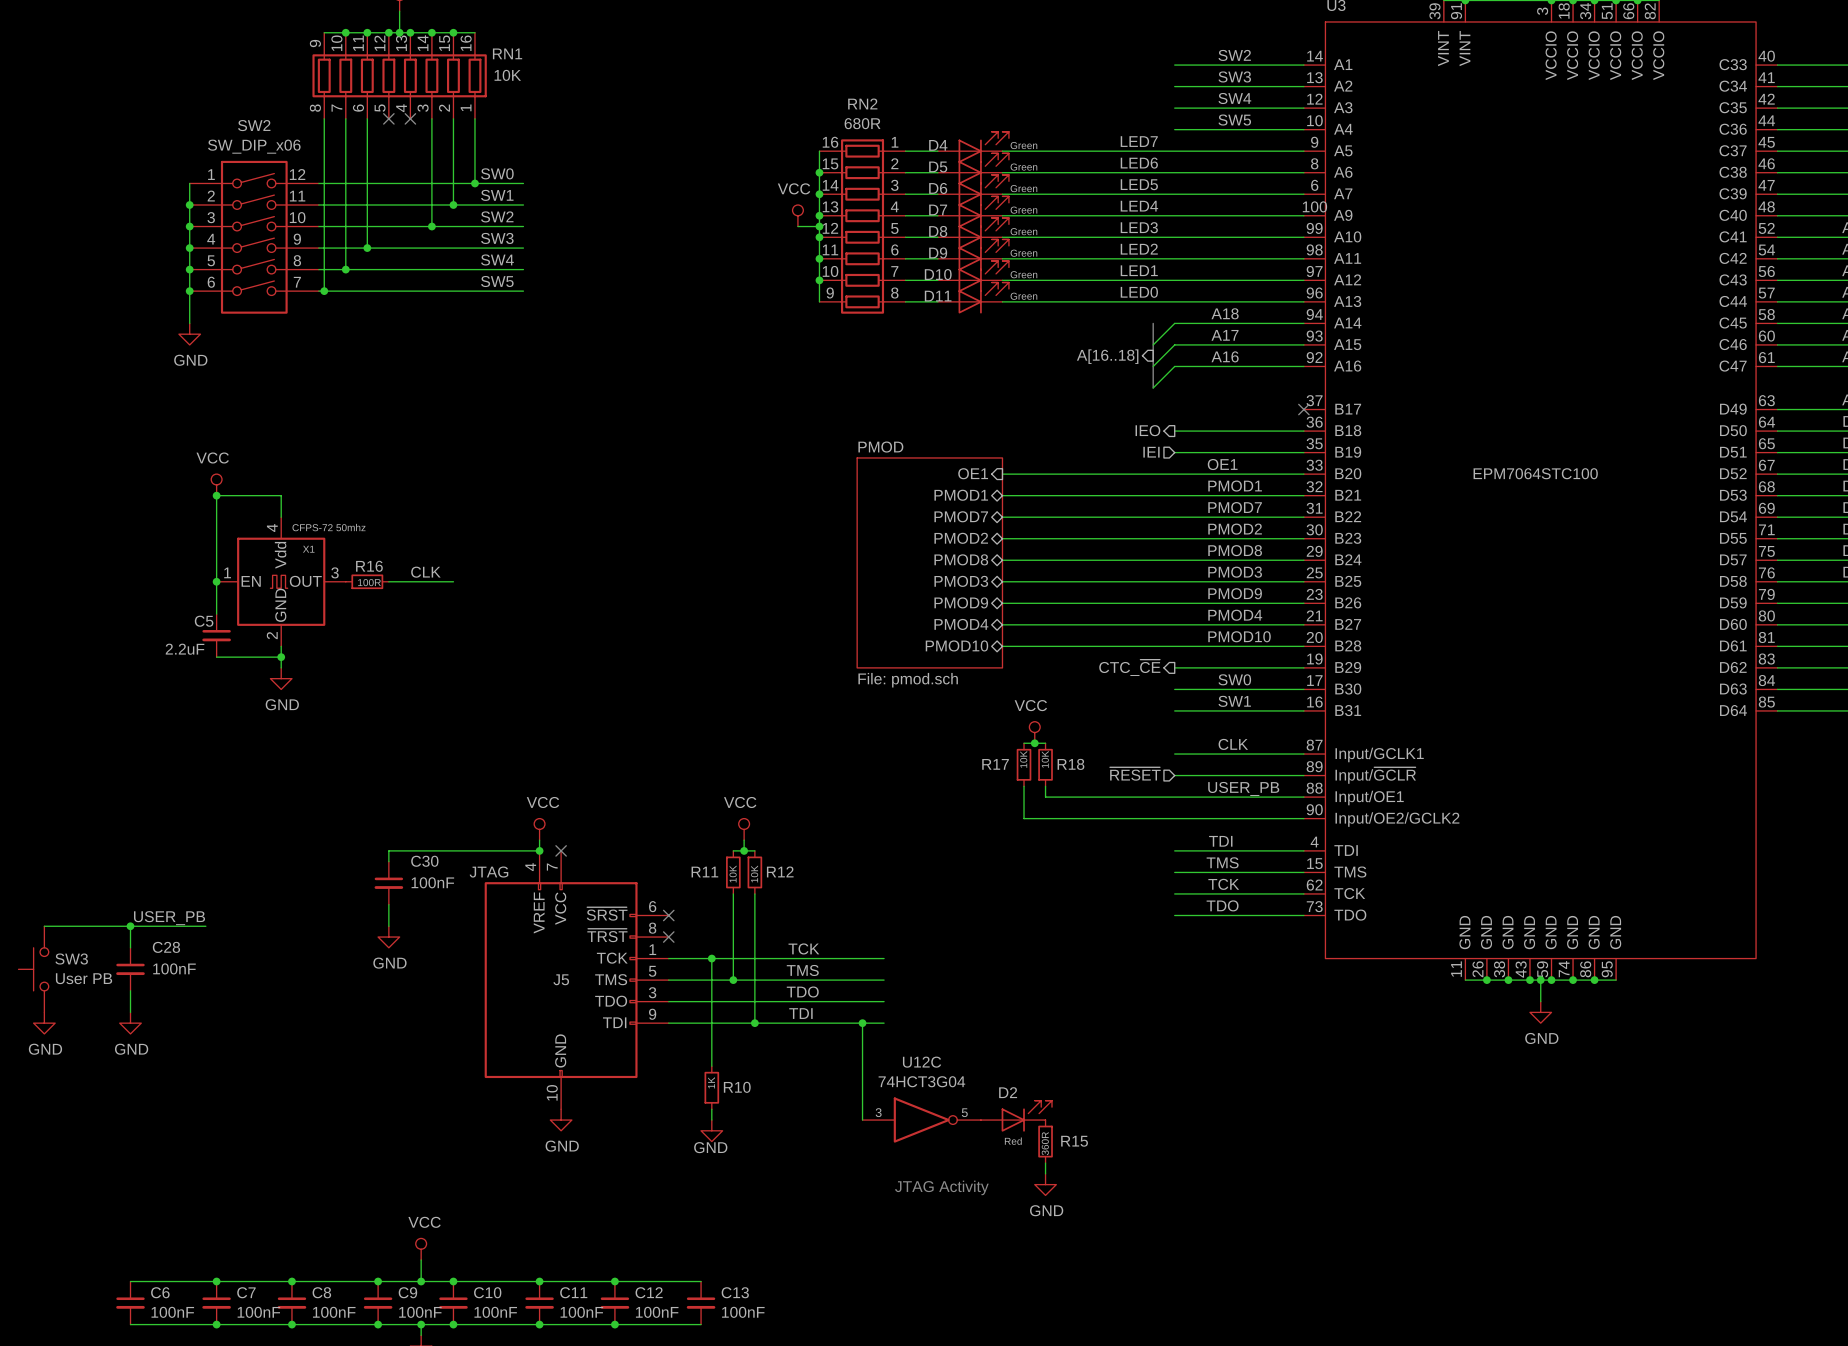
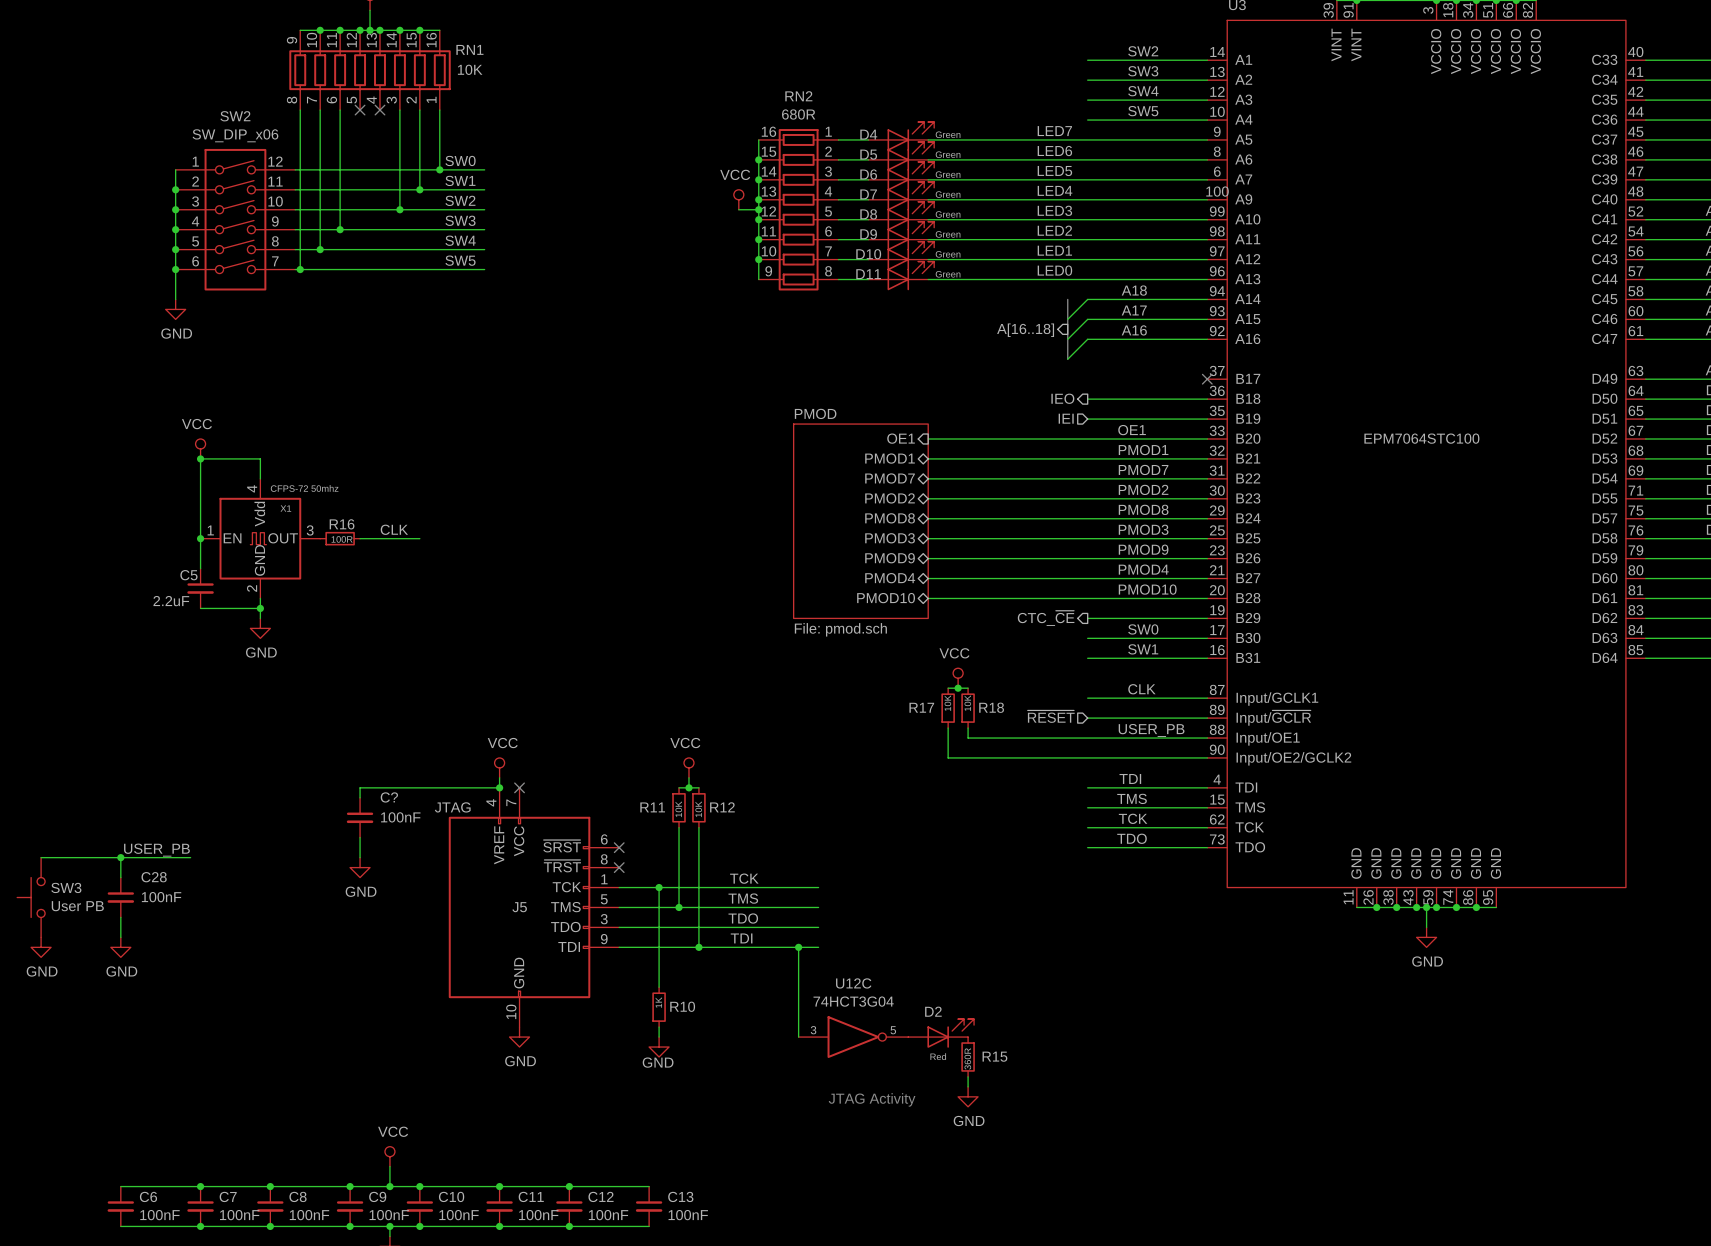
C30 name: C30 (424, 861) -> C? (389, 797)

